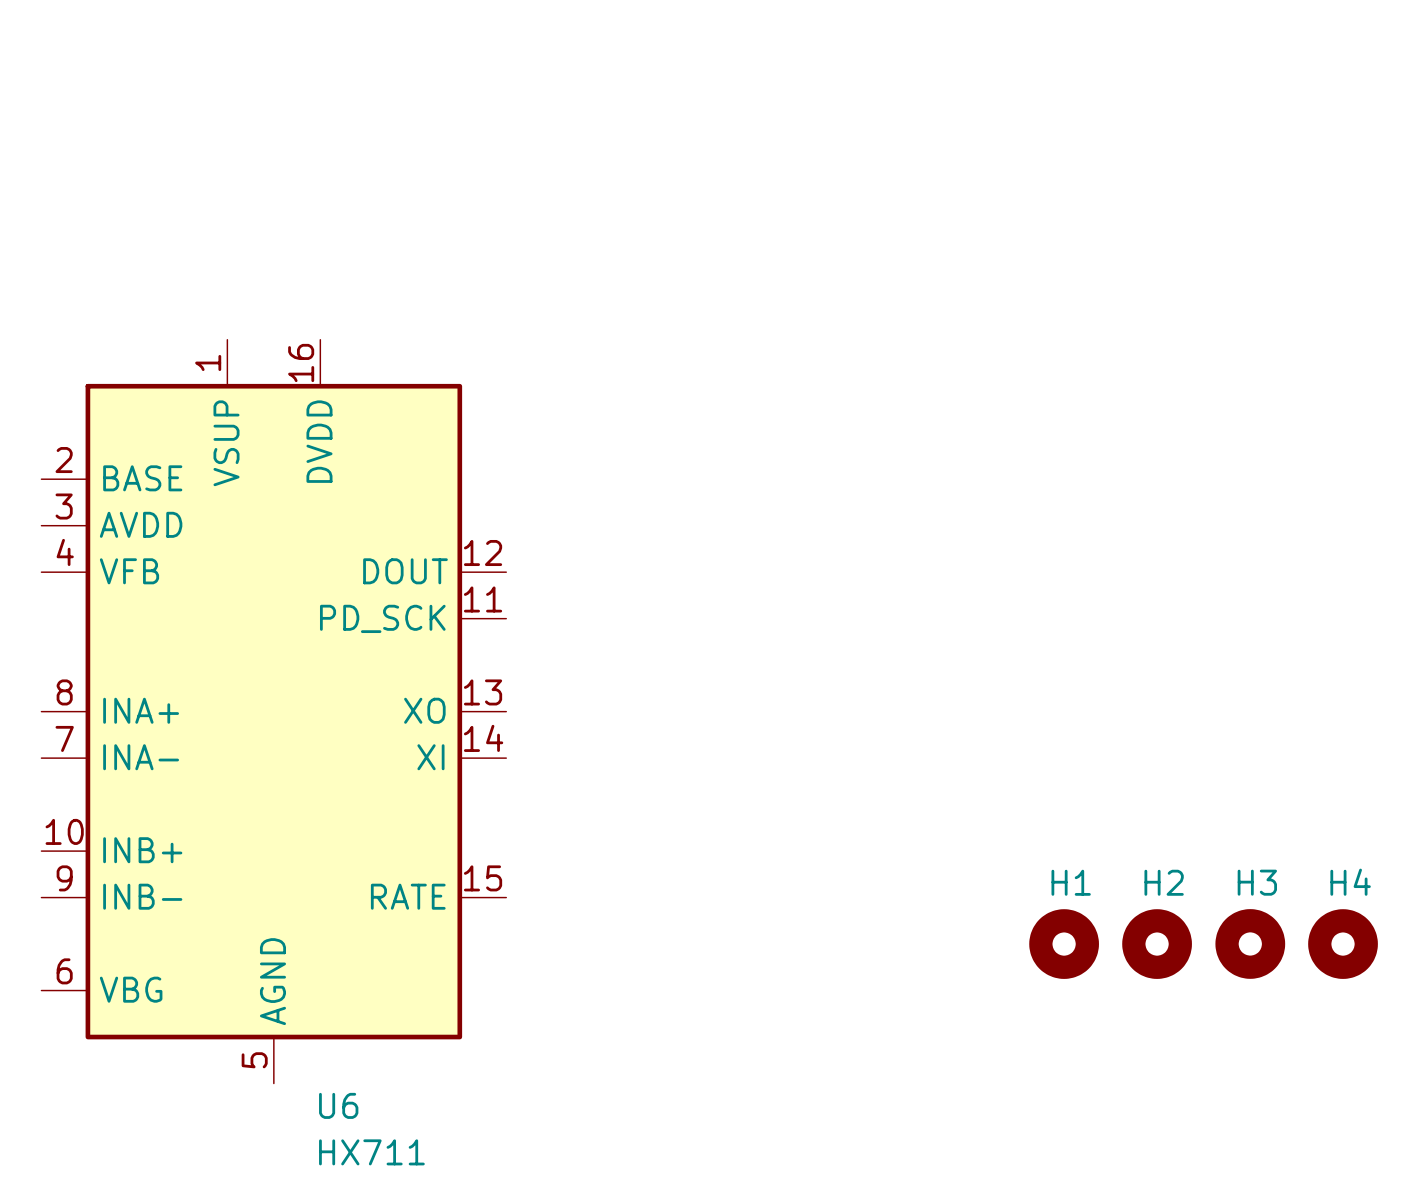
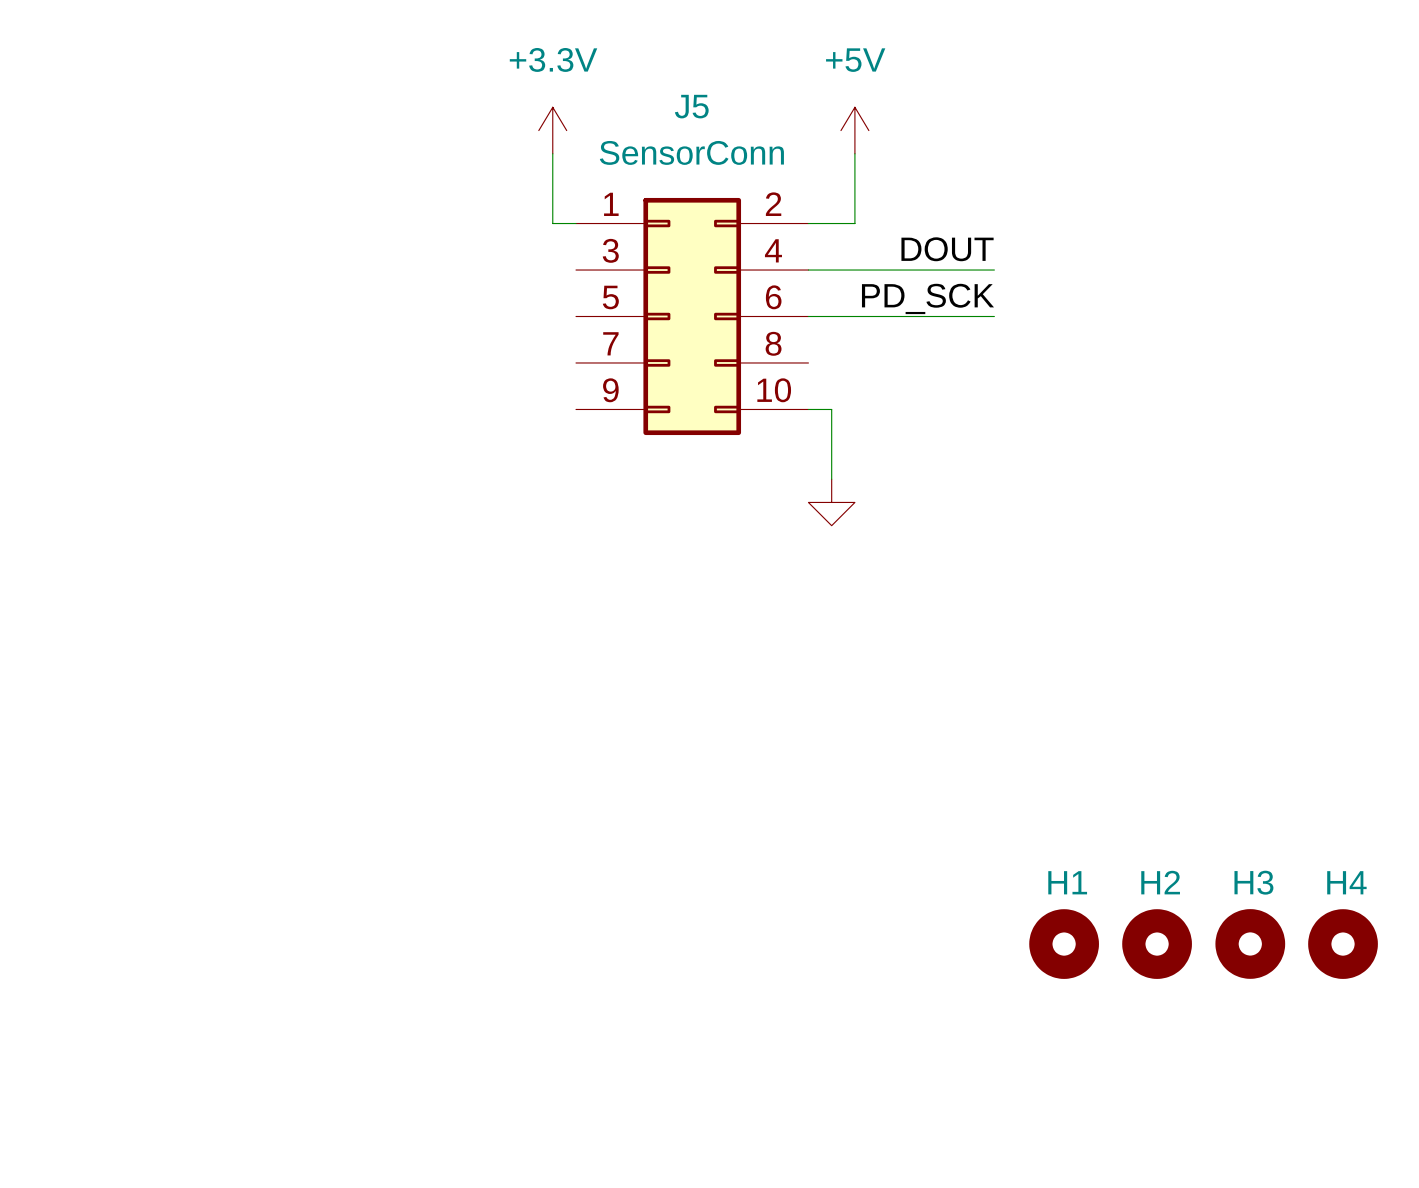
power symbol: none -> +3.3V (552, 130)
power symbol: none -> +5V (854, 130)
wire: none -> (552, 153) (552, 223) (576, 223)
wire: none -> (854, 153) (854, 223) (808, 223)
label: none -> DOUT (947, 249)
wire: none -> (808, 270) (994, 270)
label: none -> PD_SCK (927, 298)
J5: none -> SensorConn (692, 316)
wire: none -> (808, 316) (994, 316)
wire: none -> (808, 409) (831, 409) (831, 479)
power symbol: none -> (831, 502)
U6: HX711 (273, 711) -> none

